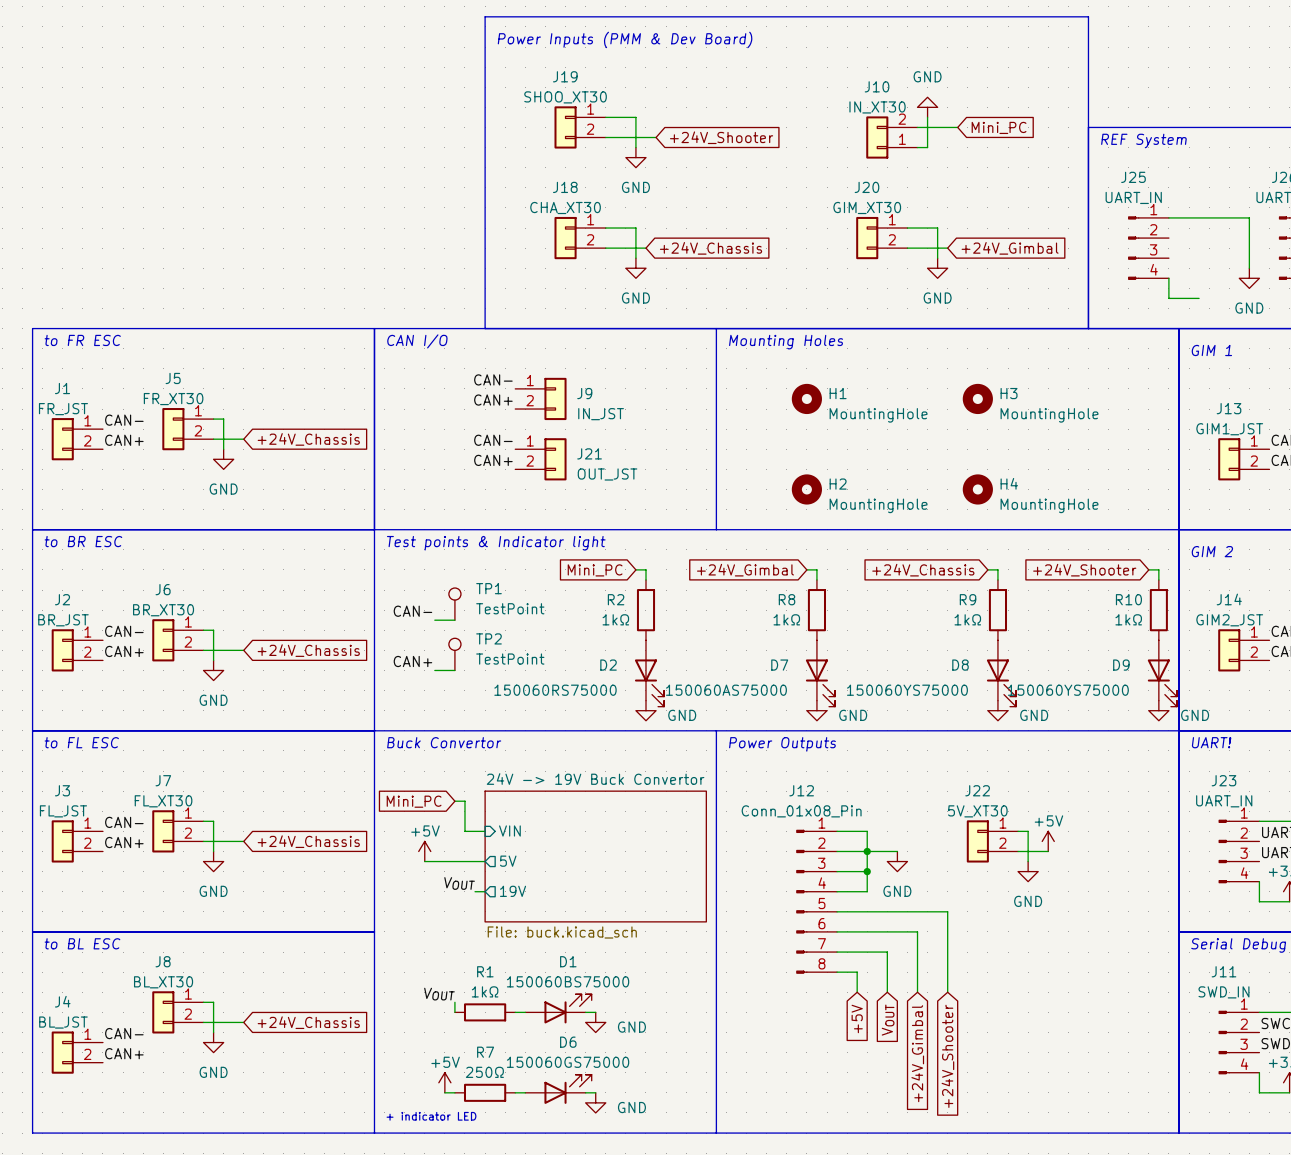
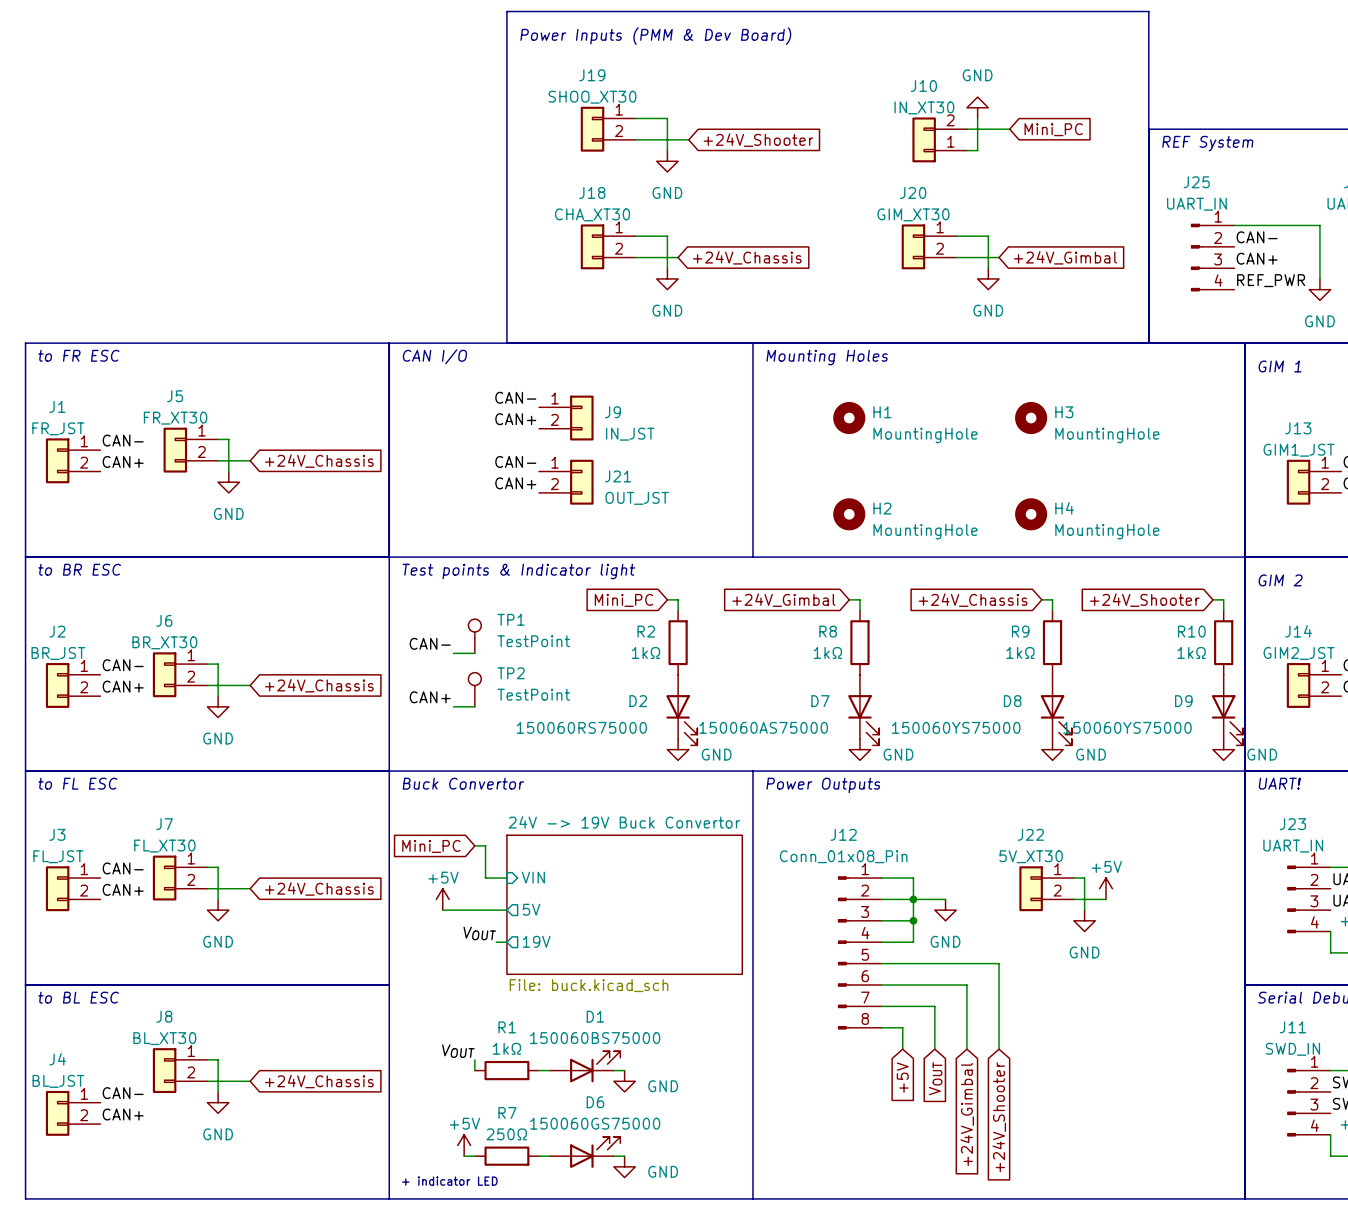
label: none -> CAN- (1257, 237)
label: none -> CAN+ (1257, 258)
label: none -> REF_PWR (1271, 280)
wire: (1168, 278) (1168, 298) (1199, 298) -> none

